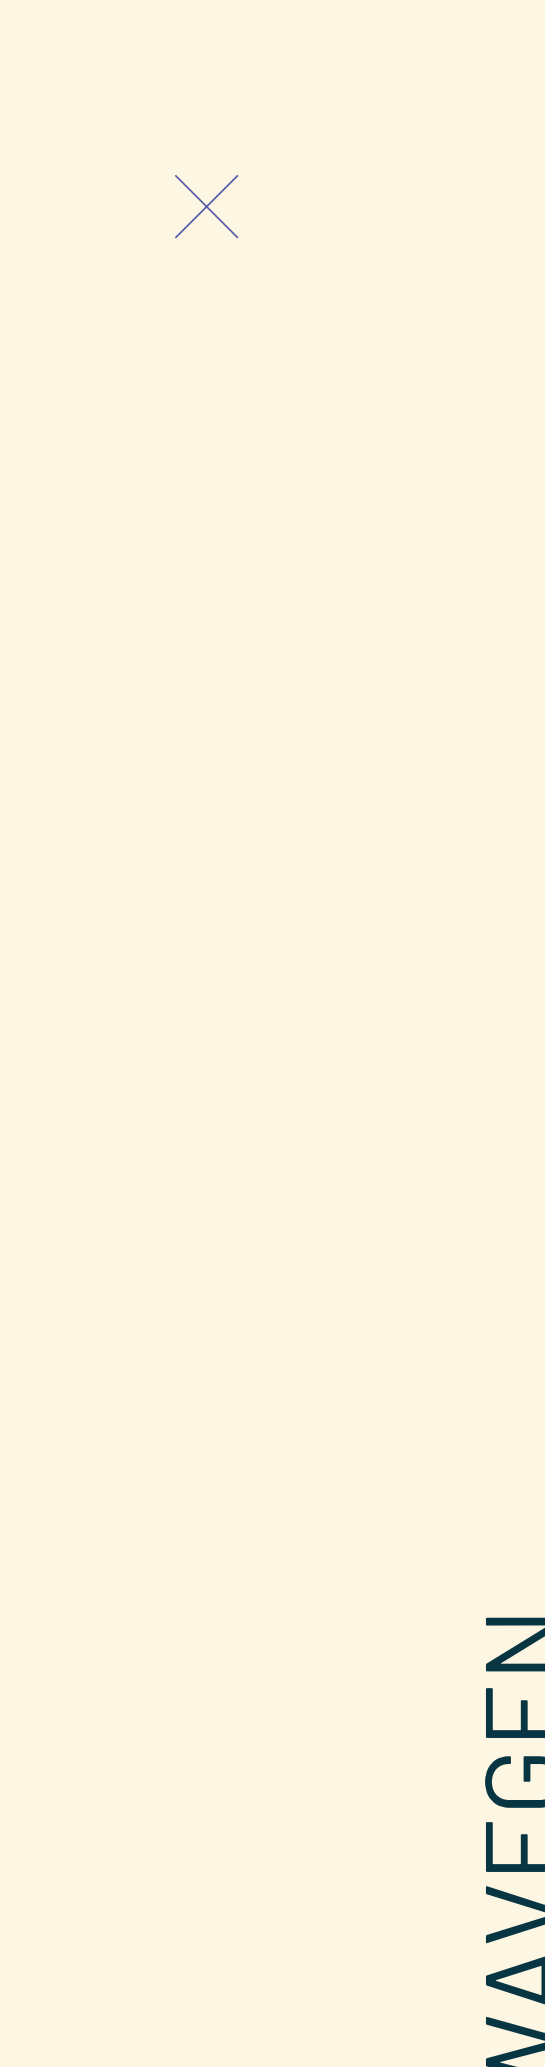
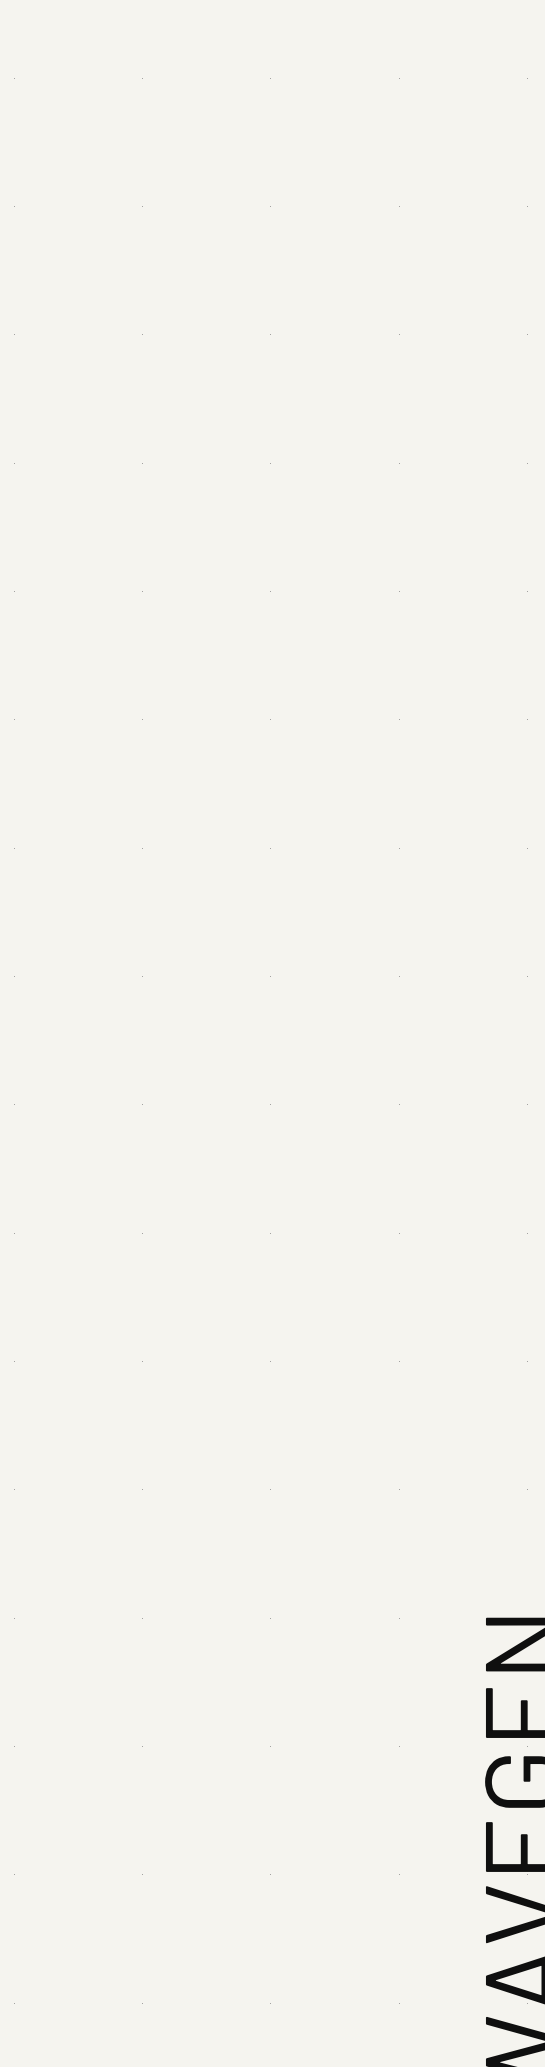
no-connect mark: (206, 206) -> none

